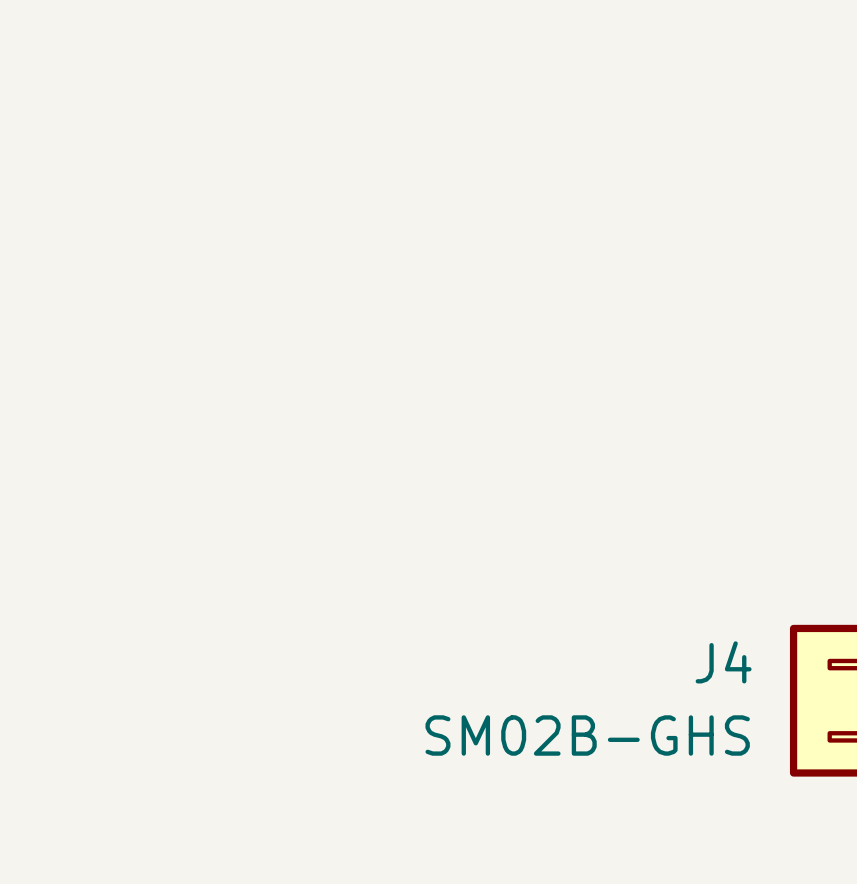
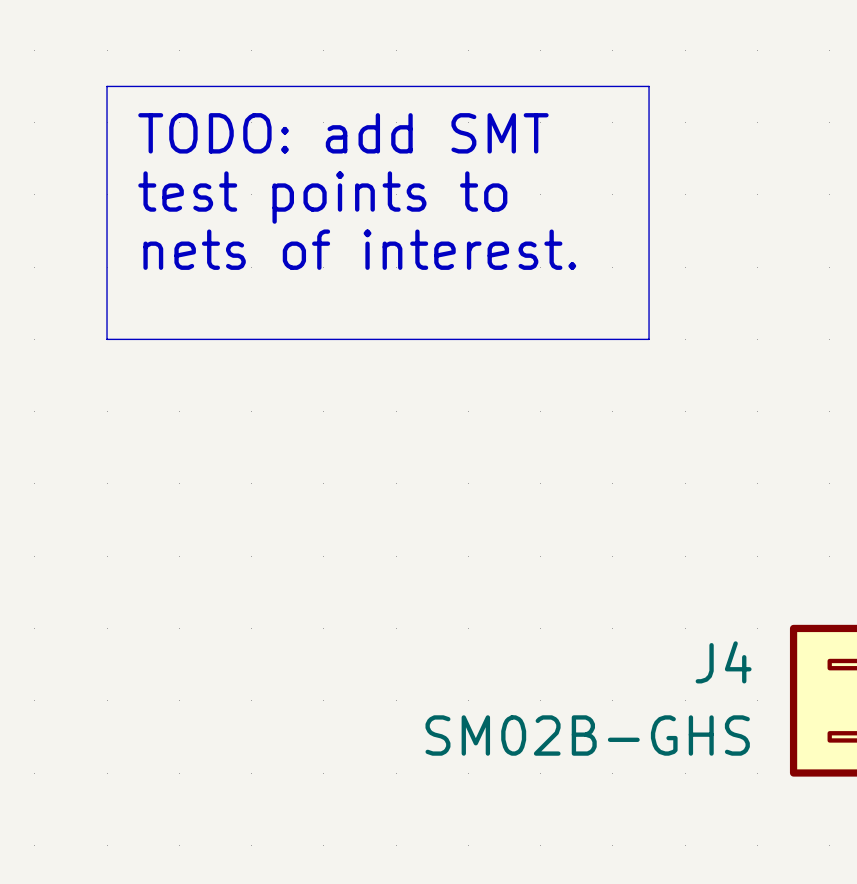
line: none -> (107, 86) (649, 86) (649, 339) (107, 339) (107, 86)
text: none -> TODO: add SMT (343, 133)
text: none -> test points to (322, 197)
text: none -> nets of interest. (359, 249)

